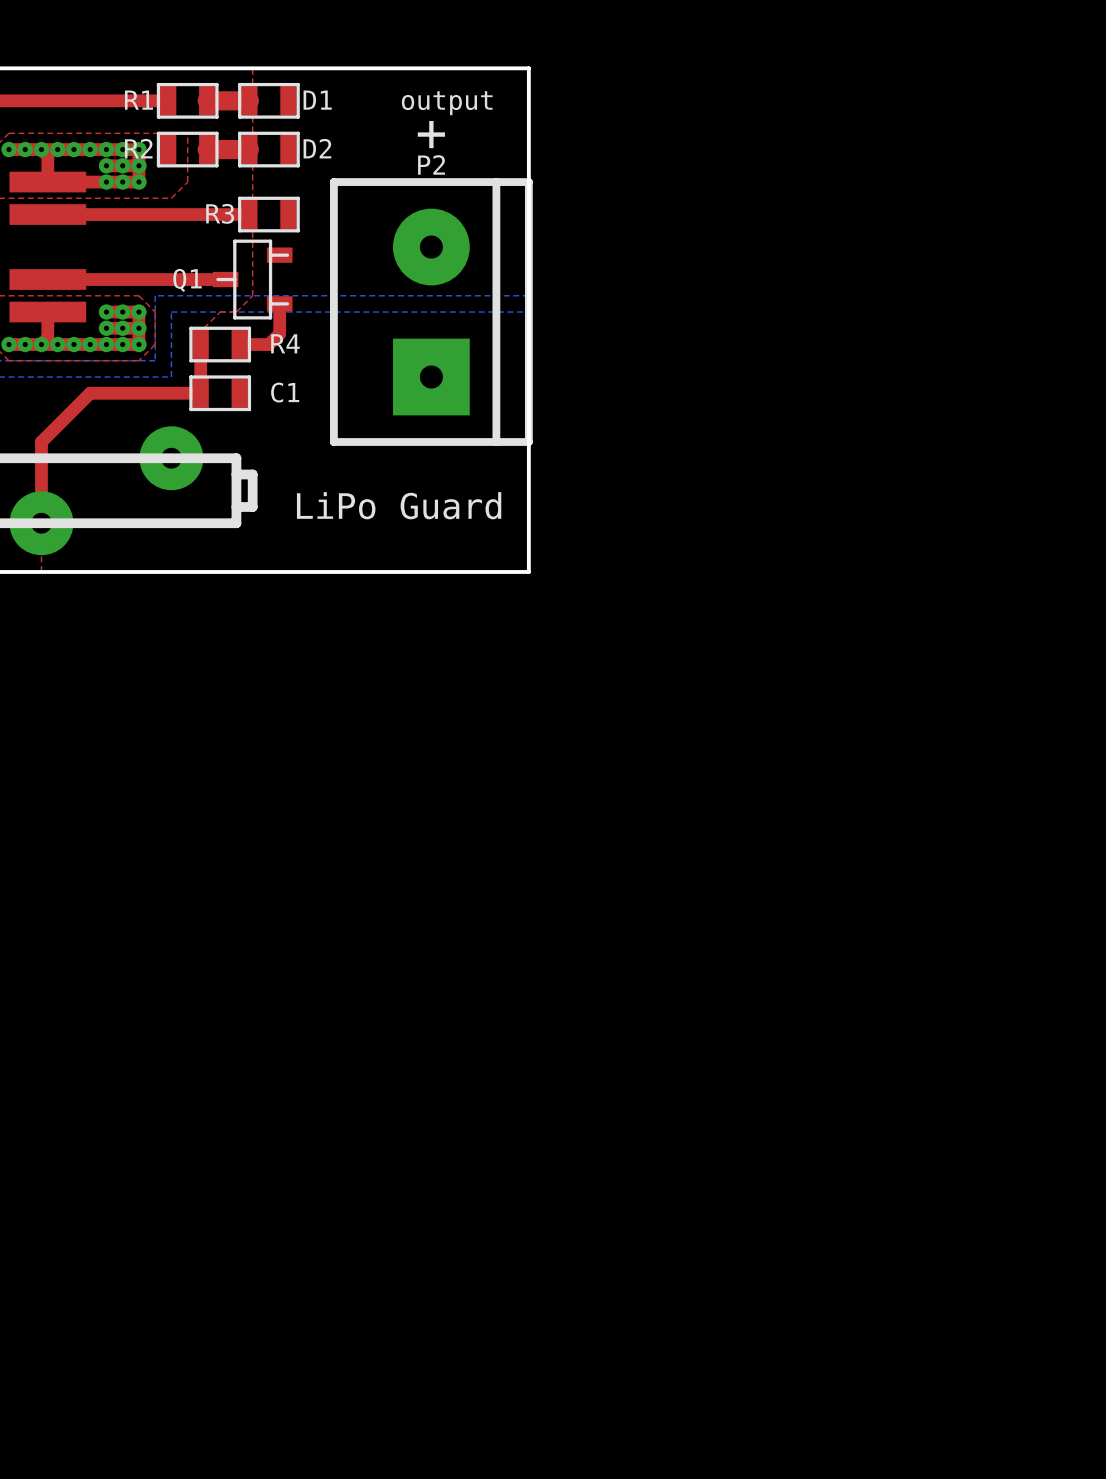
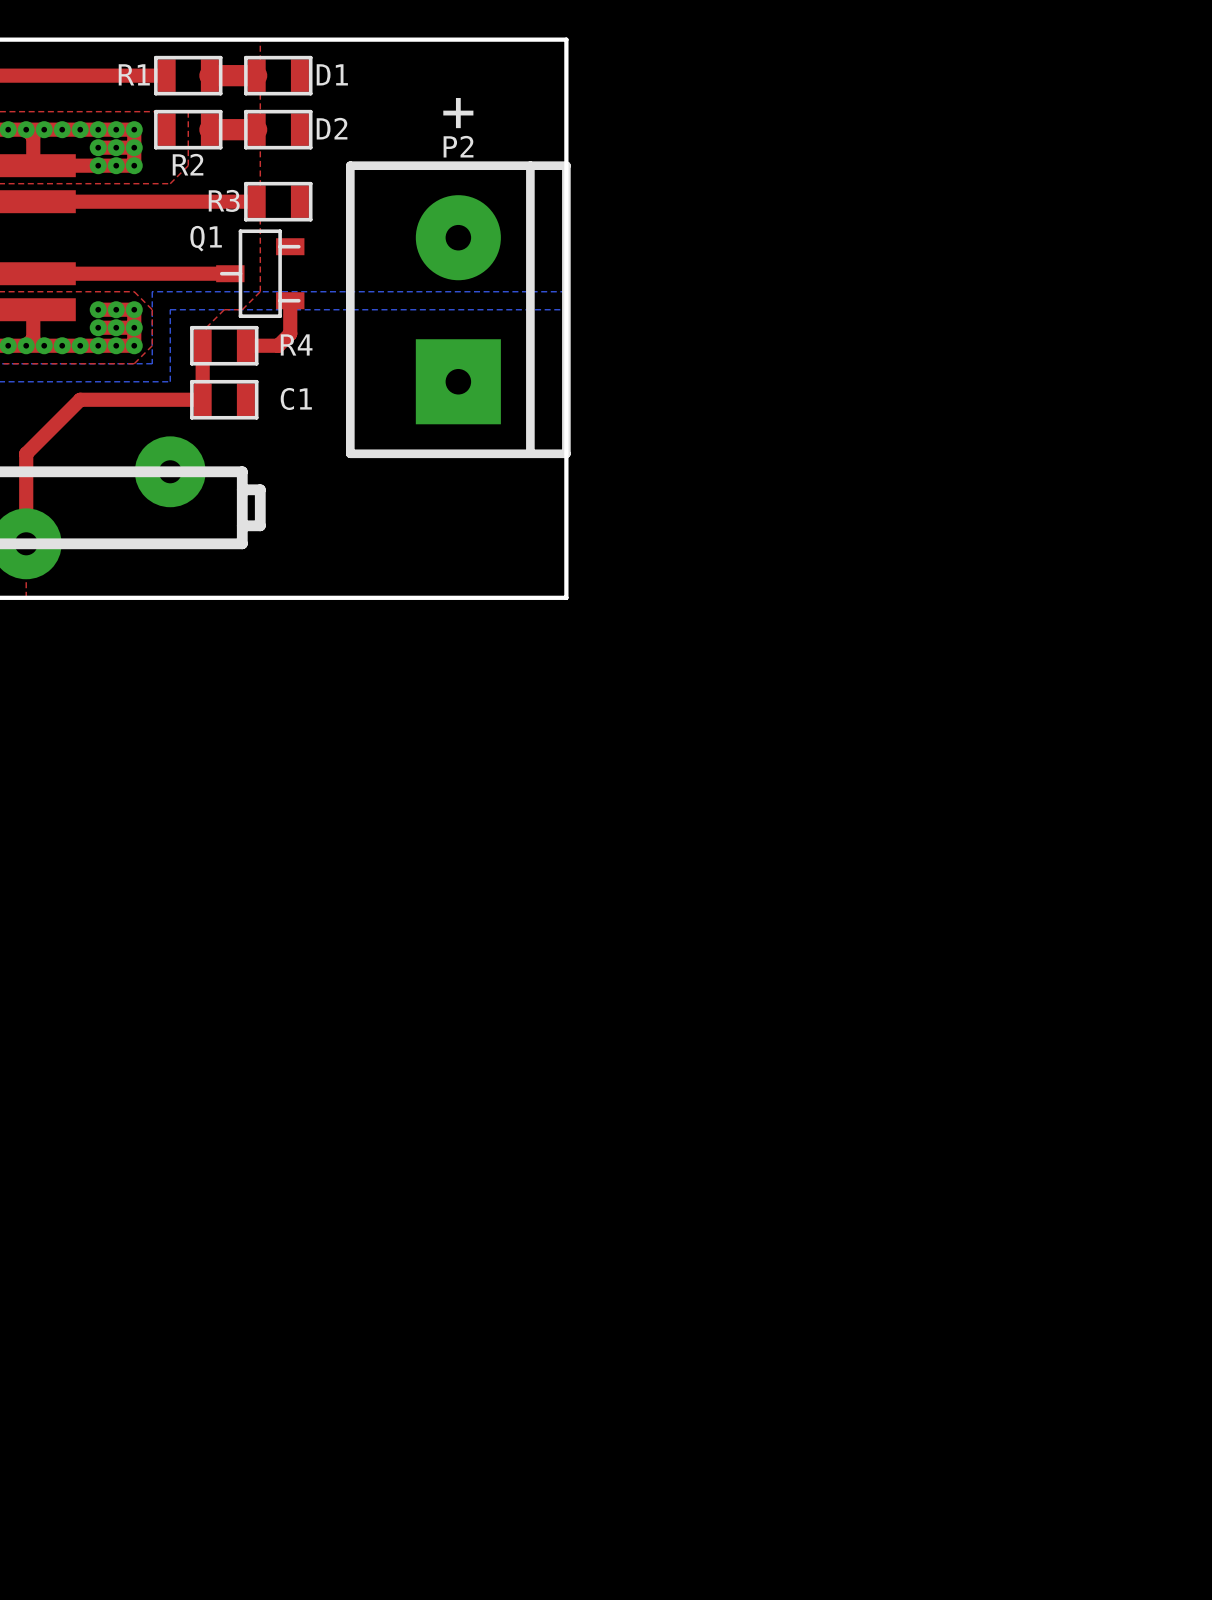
text: output (447, 103) -> none
R2 name position: R2 (138, 148) -> R2 (188, 164)
Q1 name position: Q1 (187, 280) -> Q1 (206, 238)
text: LiPo Guard (399, 505) -> none

